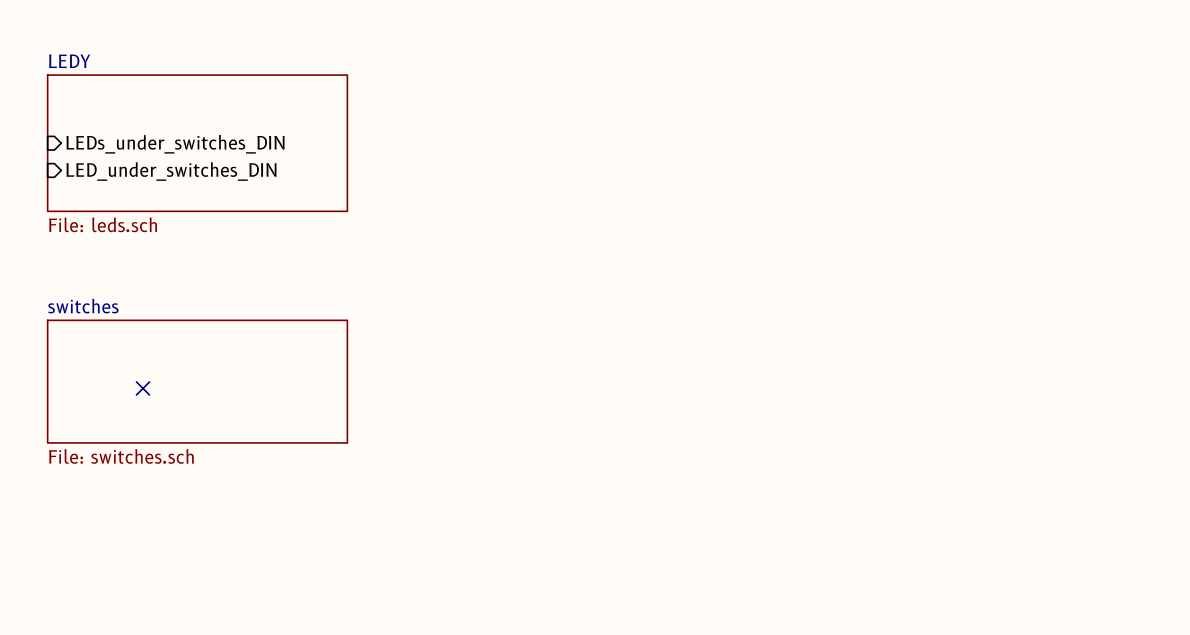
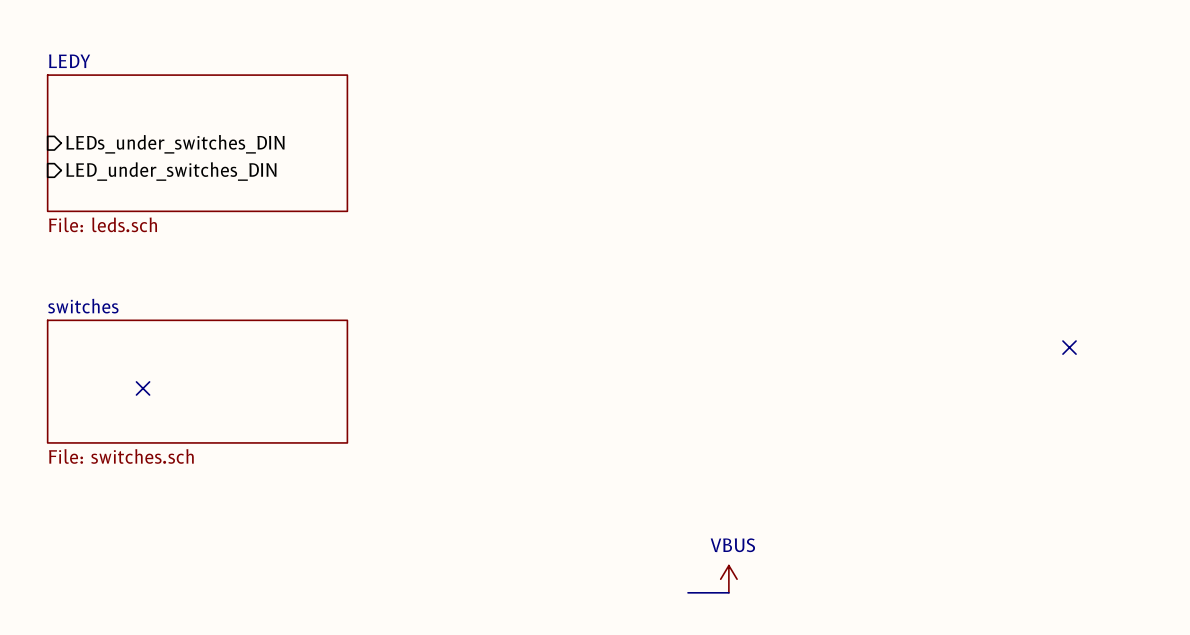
no-connect mark: none -> (1069, 347)
power symbol: none -> VBUS (728, 579)
wire: none -> (688, 592) (728, 592)

